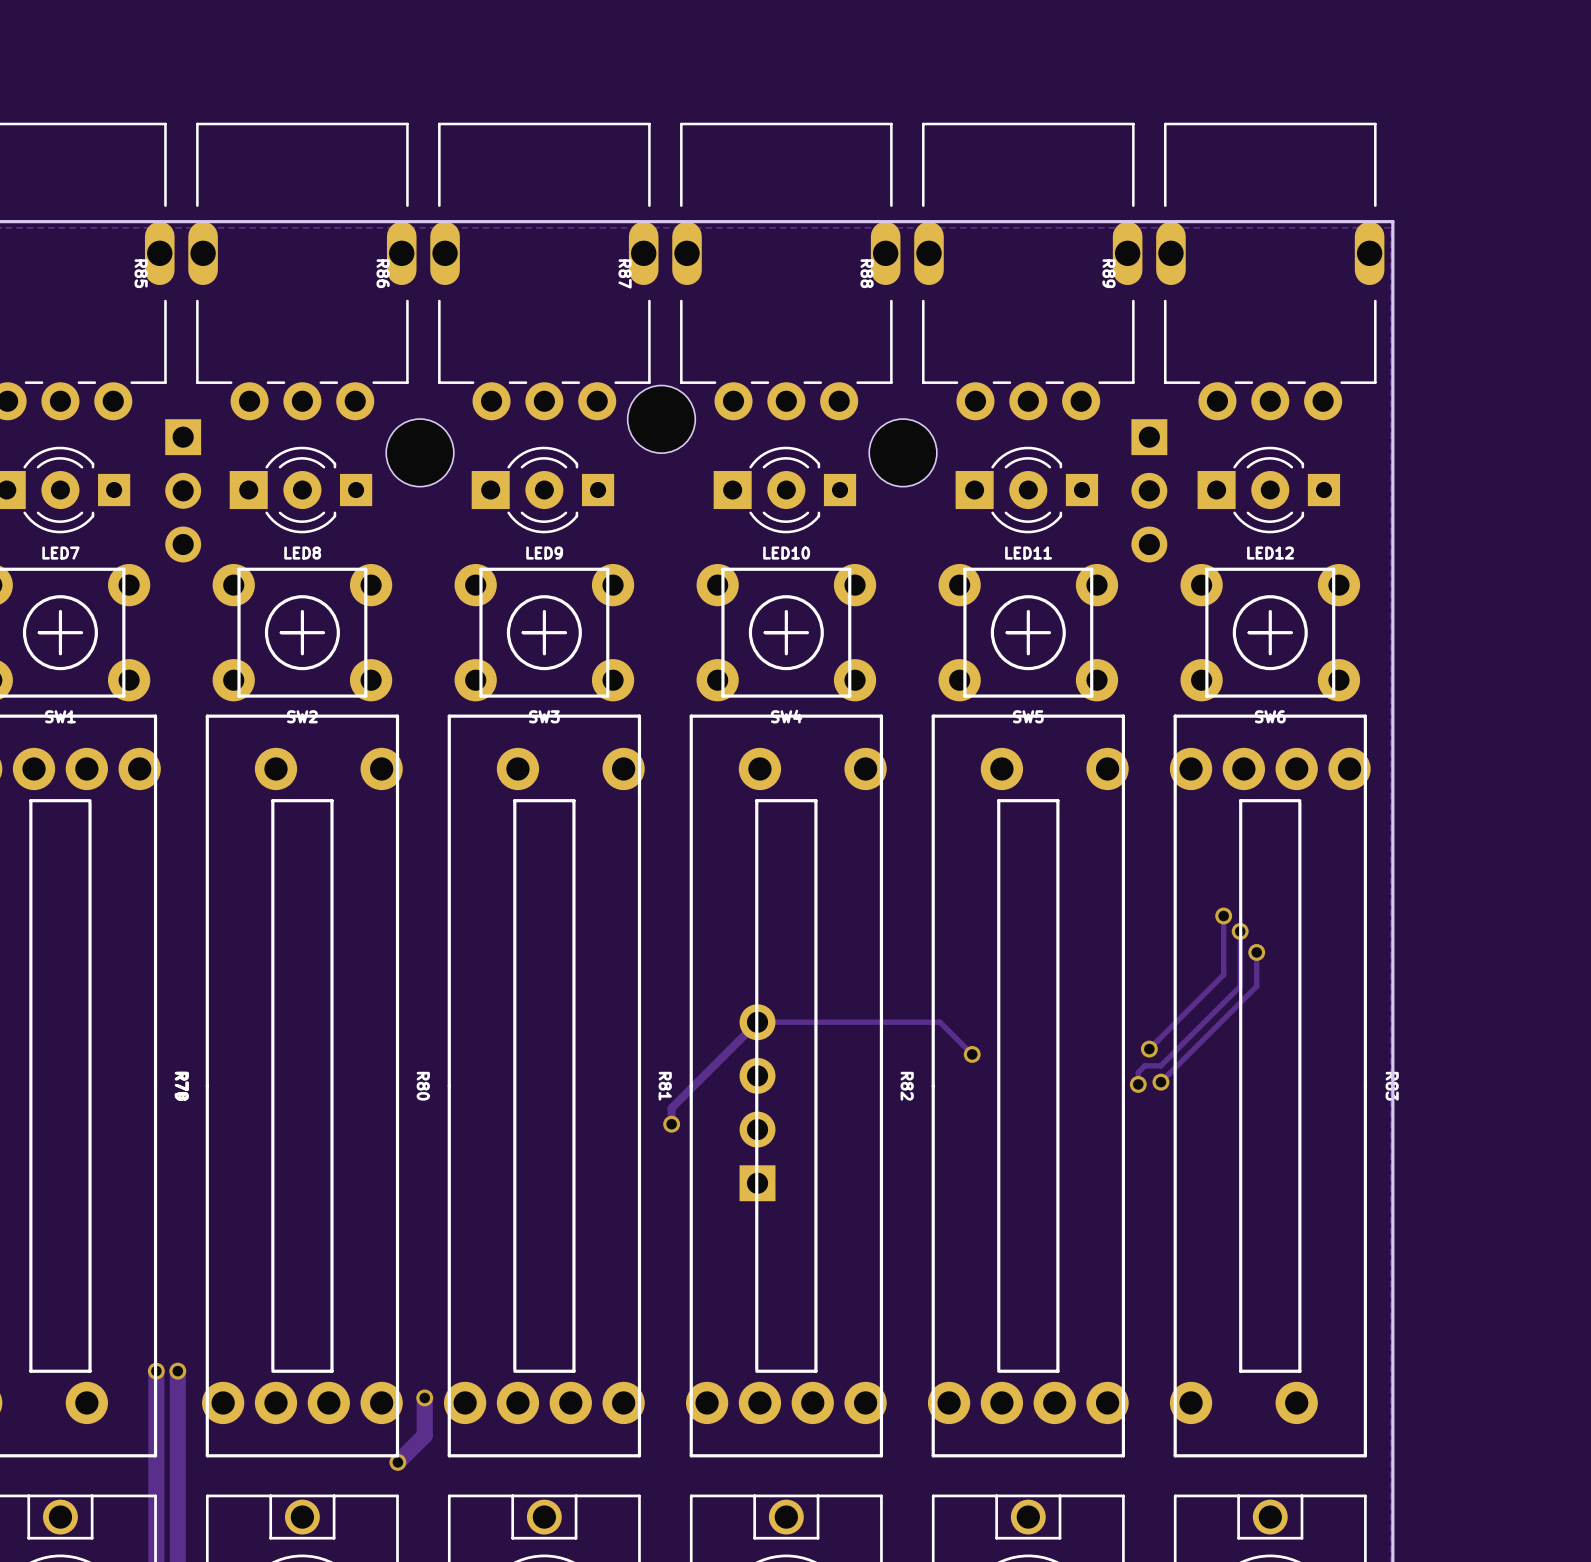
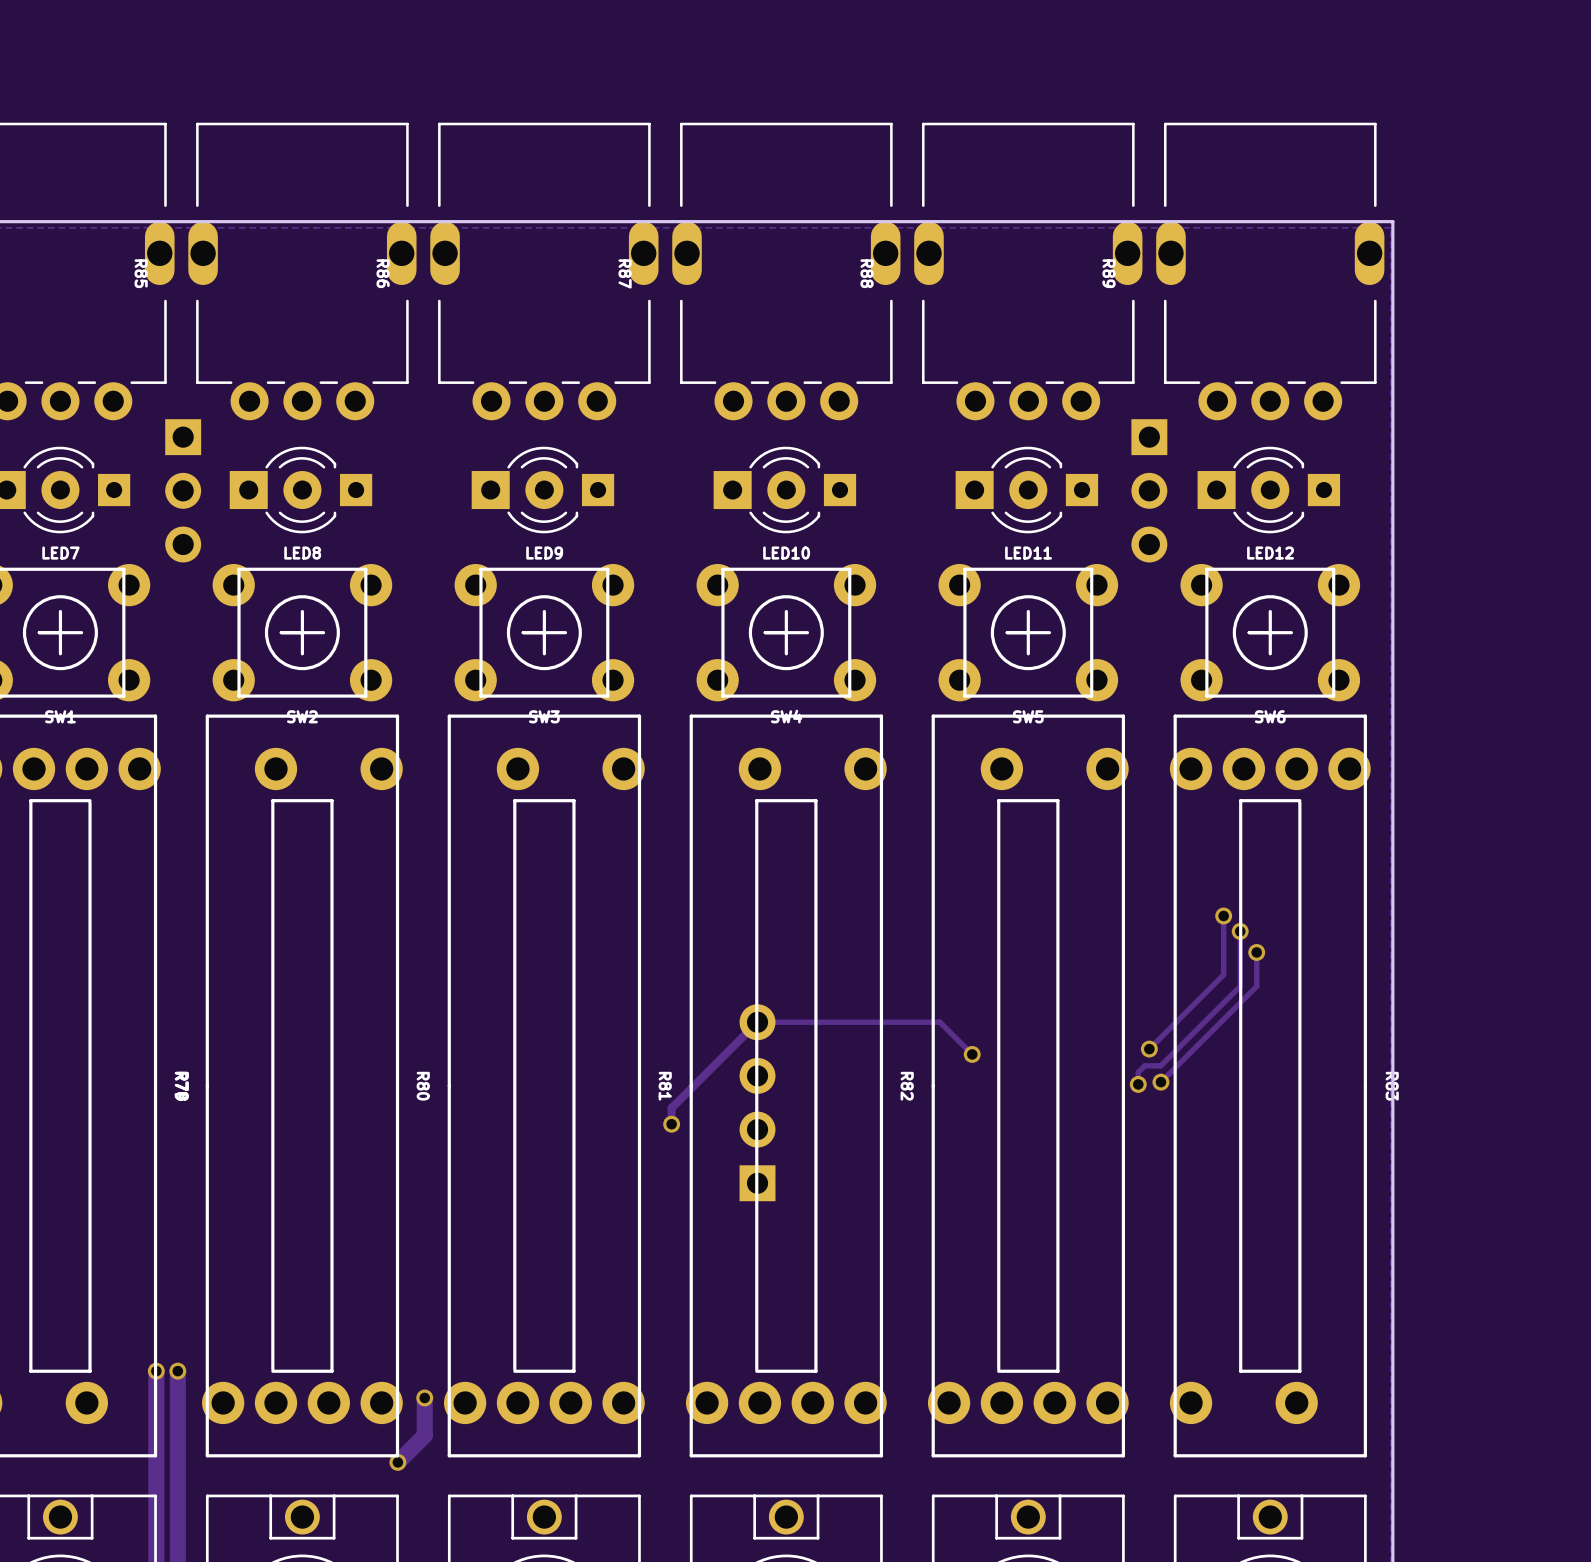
part: (661, 419) -> none
part: (420, 452) -> none
part: (903, 452) -> none

